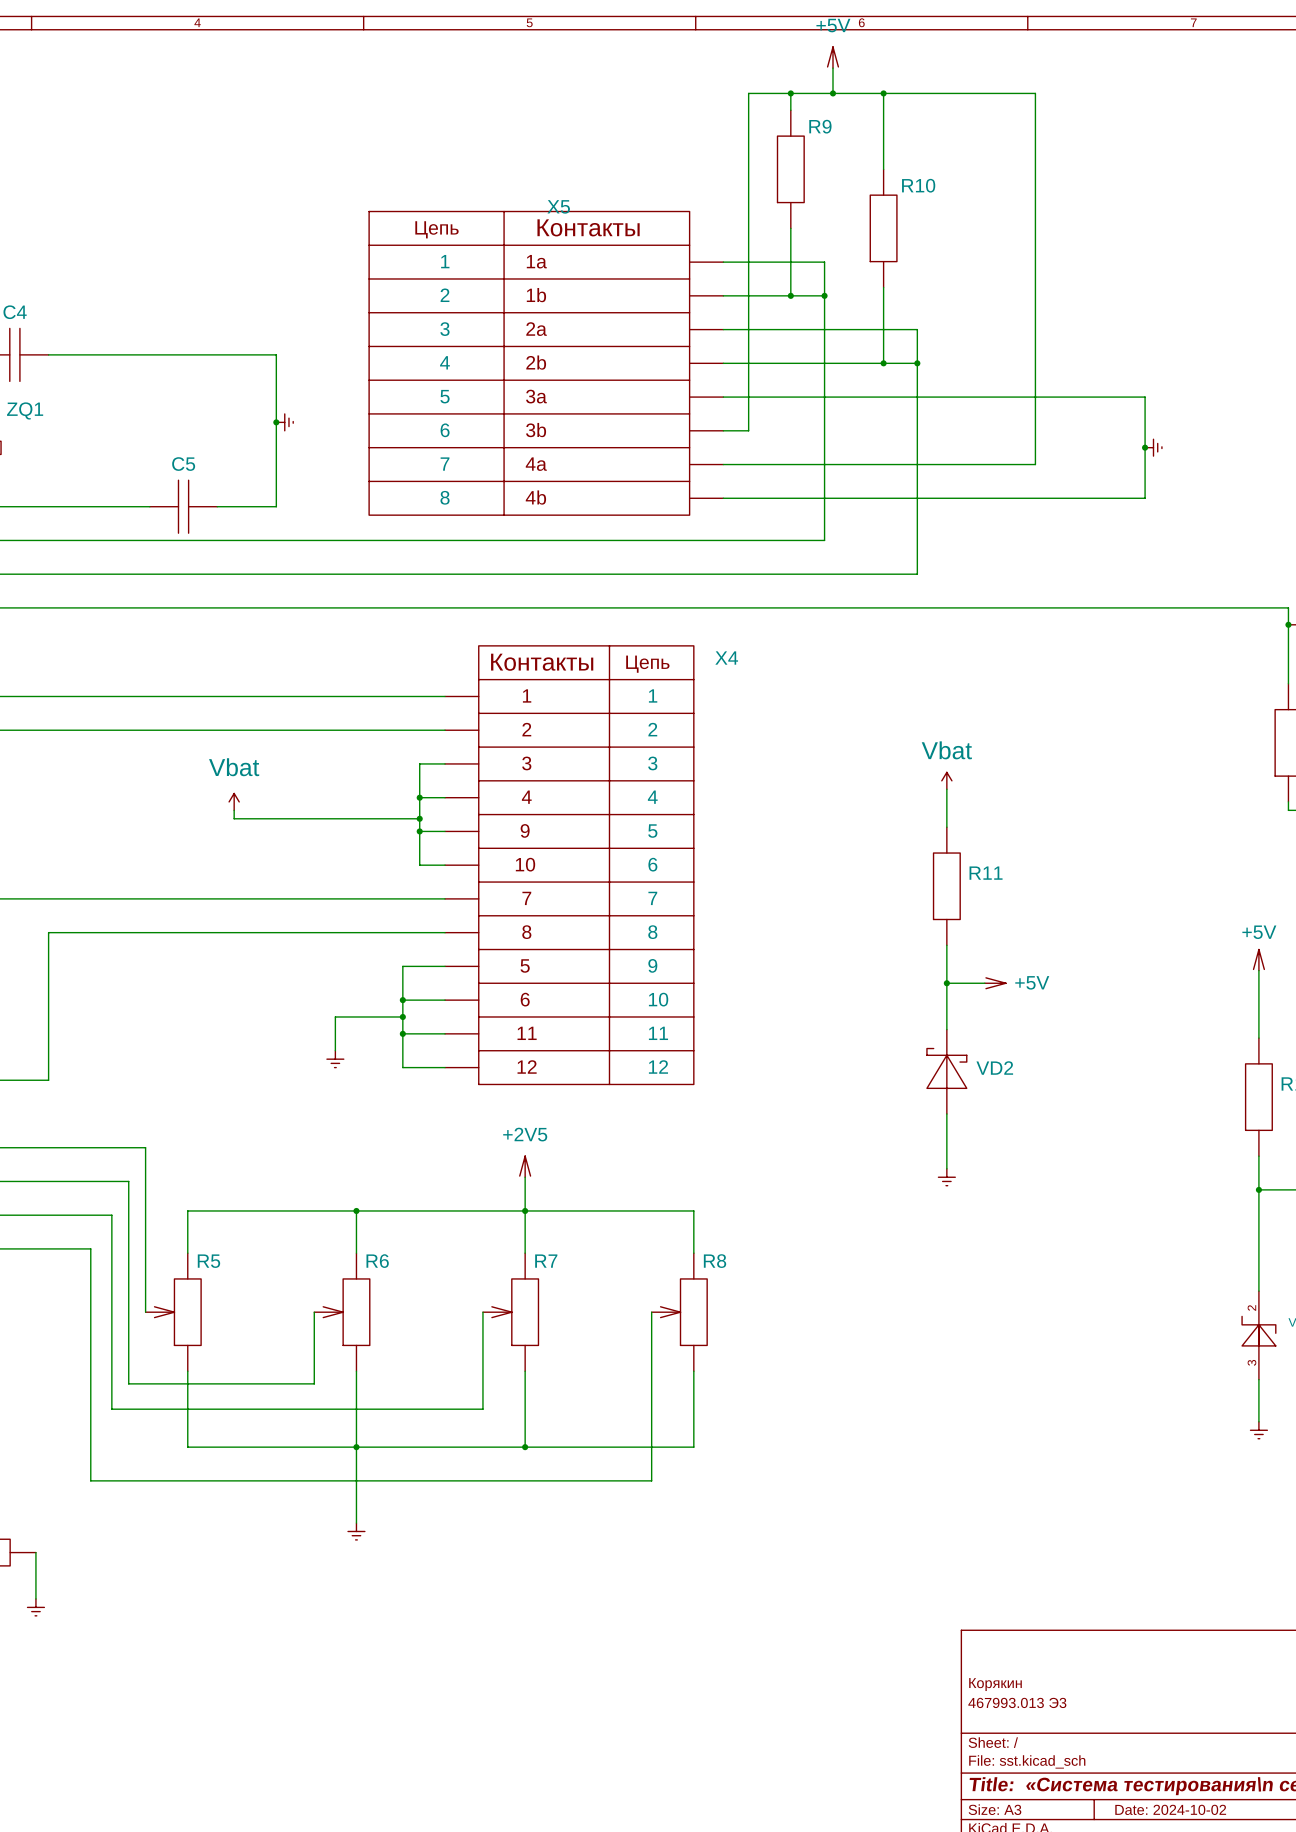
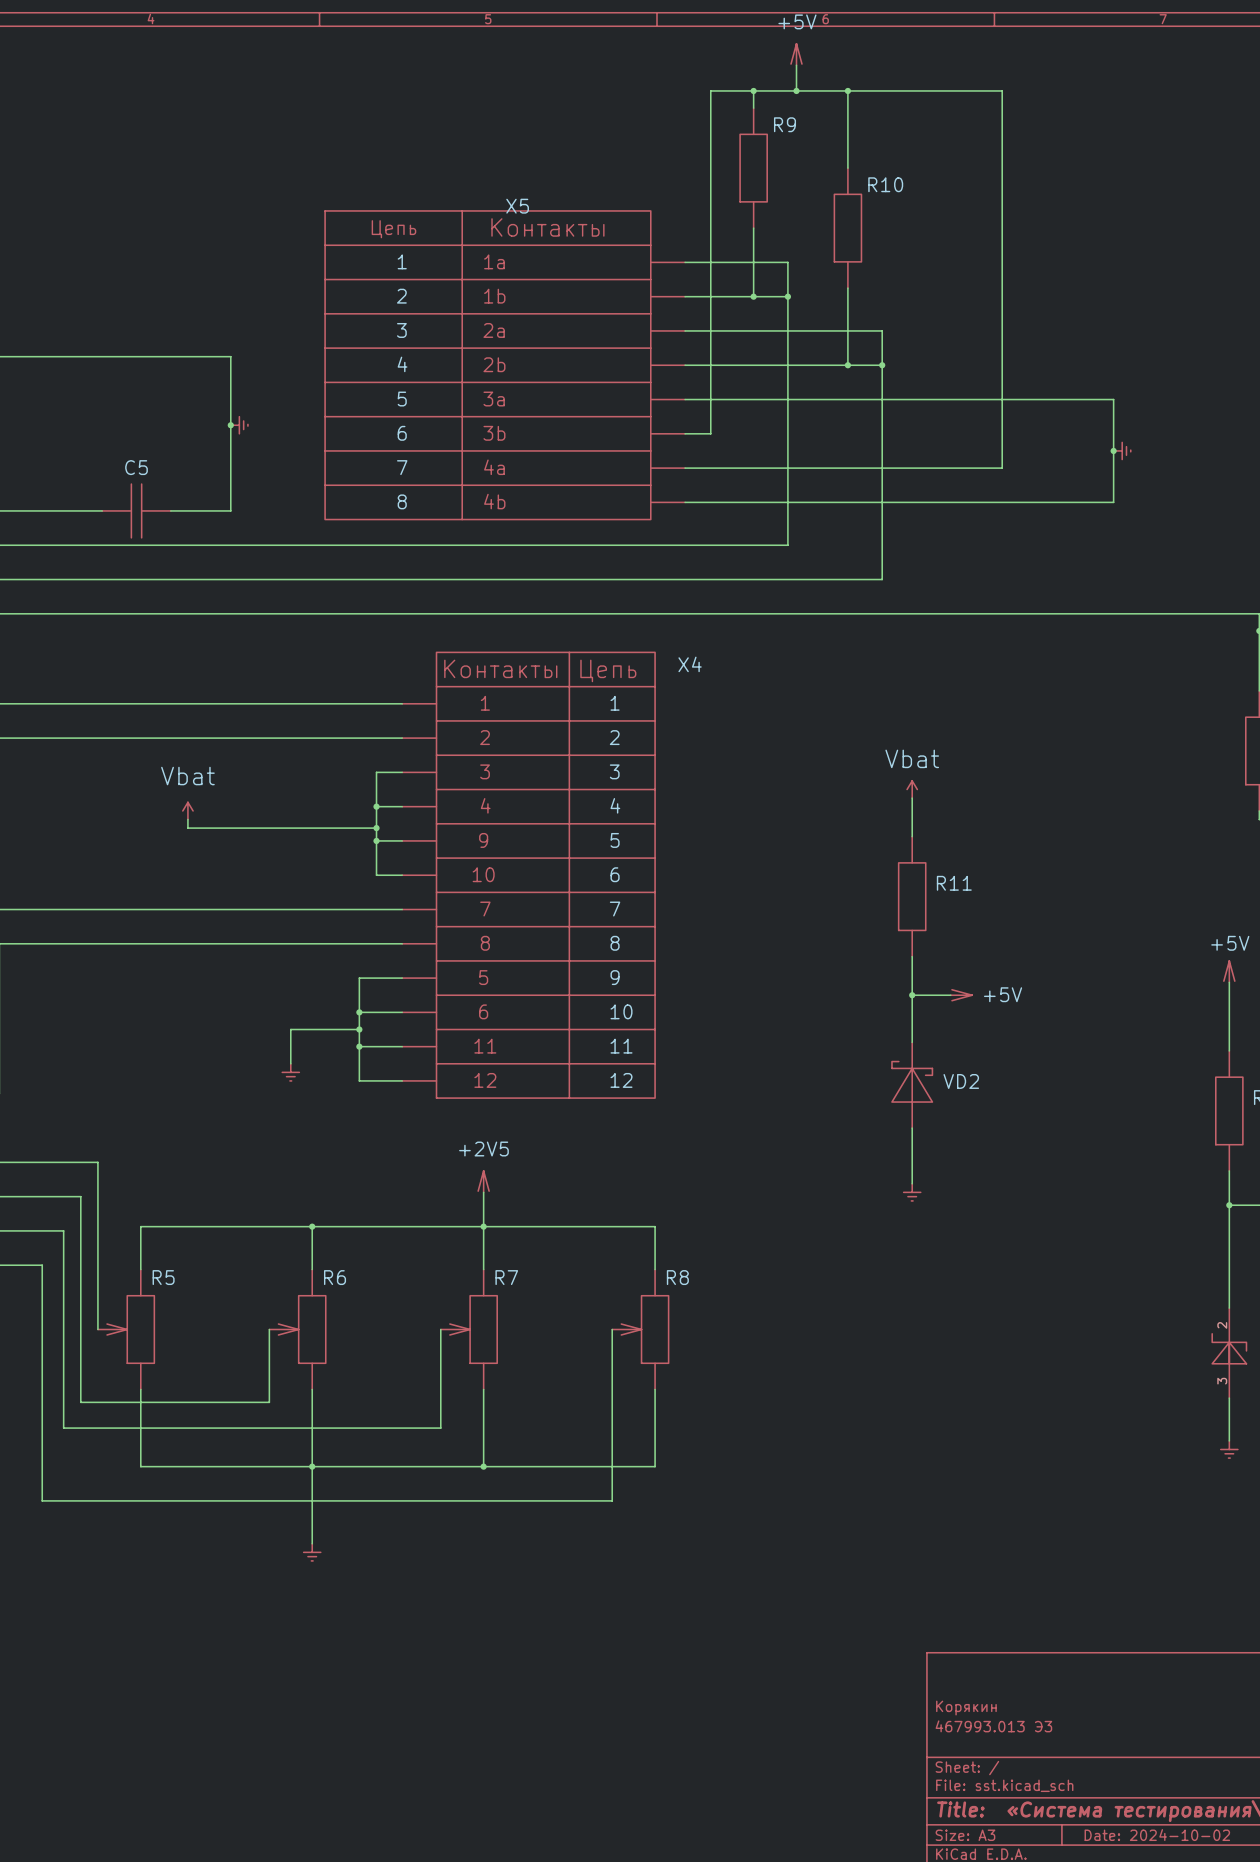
X4 symbol: [445, 645, 694, 1085] -> [402, 652, 656, 1099]

